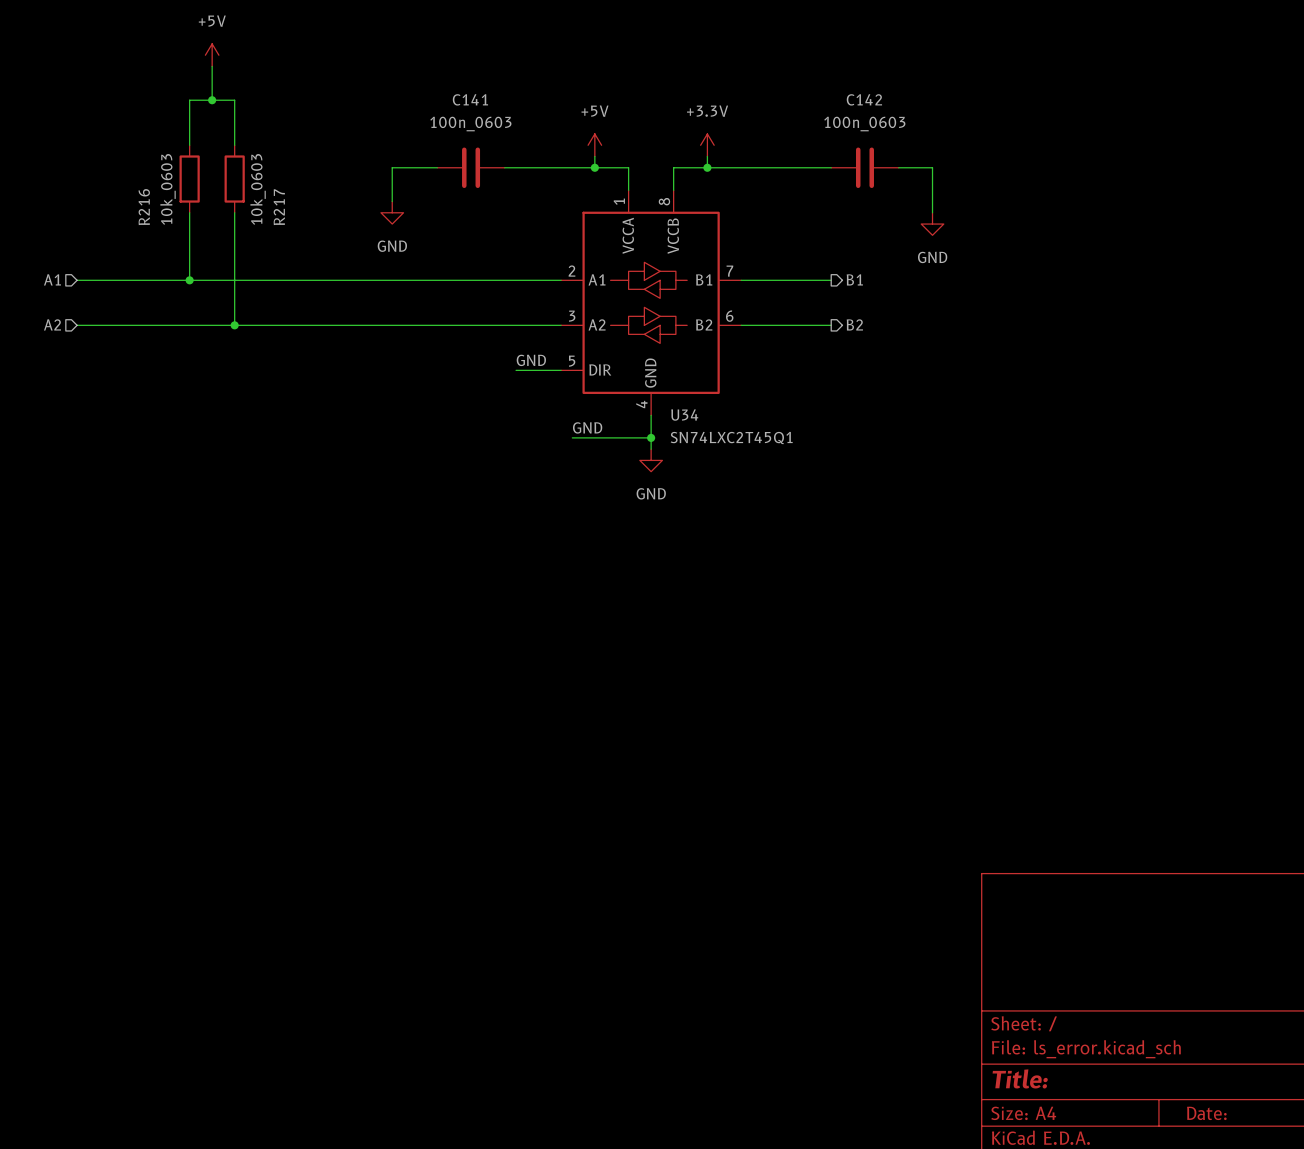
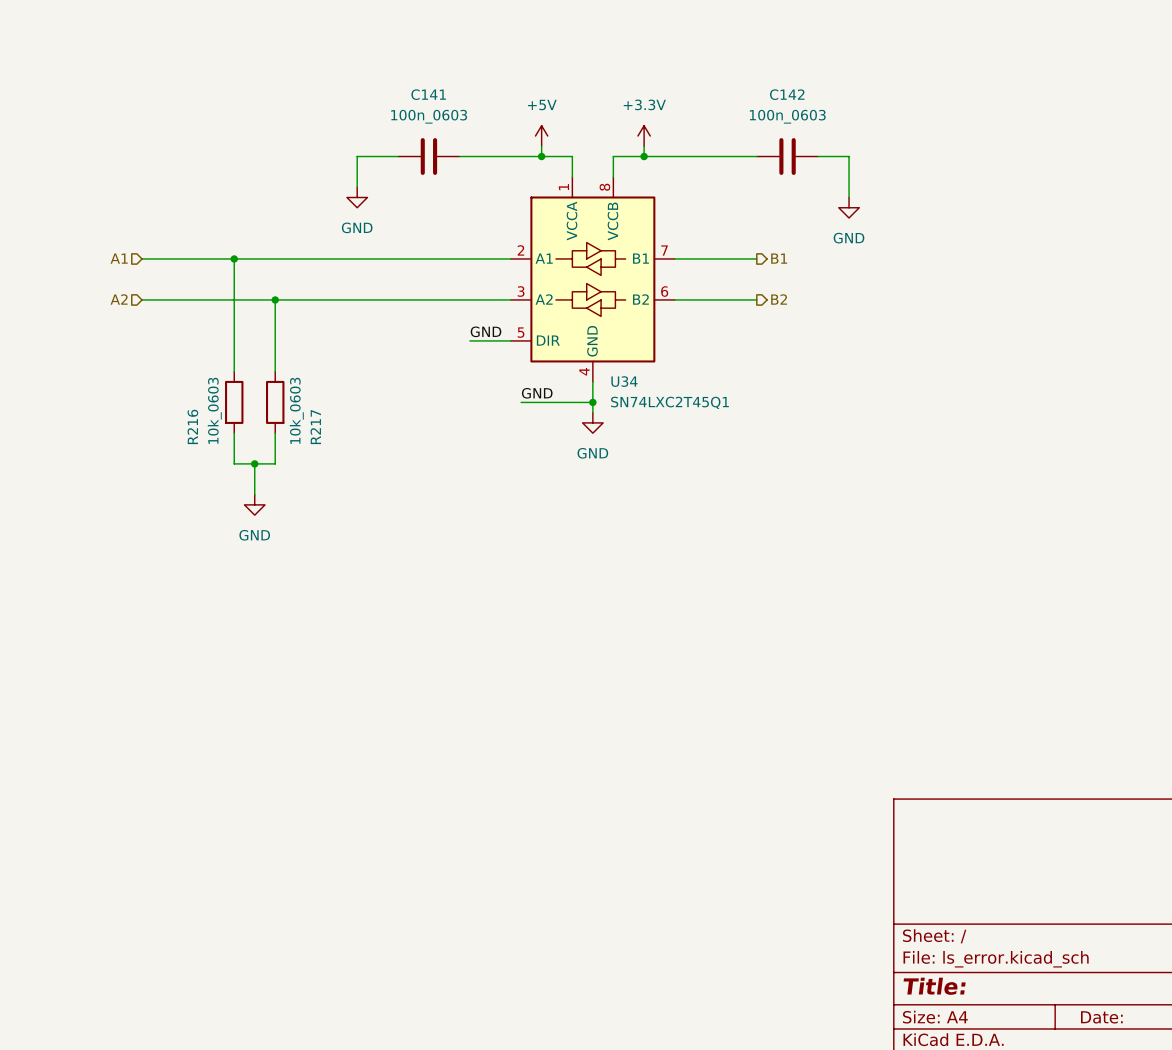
power symbol: +5V (212, 55) -> none
wire: (212, 66) (212, 100) -> none
junction: (212, 100) -> none
wire: (189, 145) (189, 100) (234, 100) (234, 145) -> none
R216 position: (189, 179) -> (234, 402)
R217 position: (234, 179) -> (275, 402)
wire: (189, 212) (189, 280) -> none
wire: (234, 212) (234, 325) -> none
hierarchical label position: A1 (52, 279) -> A1 (119, 258)
wire: (77, 280) (155, 280) -> none
junction: (189, 280) -> none
wire: none -> (234, 258) (234, 371)
junction: none -> (234, 258)
hierarchical label position: A2 (52, 324) -> A2 (119, 299)
wire: (77, 325) (155, 325) -> none
junction: (234, 325) -> none
wire: none -> (275, 299) (275, 371)
junction: none -> (275, 299)
wire: none -> (234, 433) (234, 463) (275, 463) (275, 433)
wire: none -> (254, 463) (254, 494)
junction: none -> (254, 463)
power symbol: none -> GND (254, 504)

